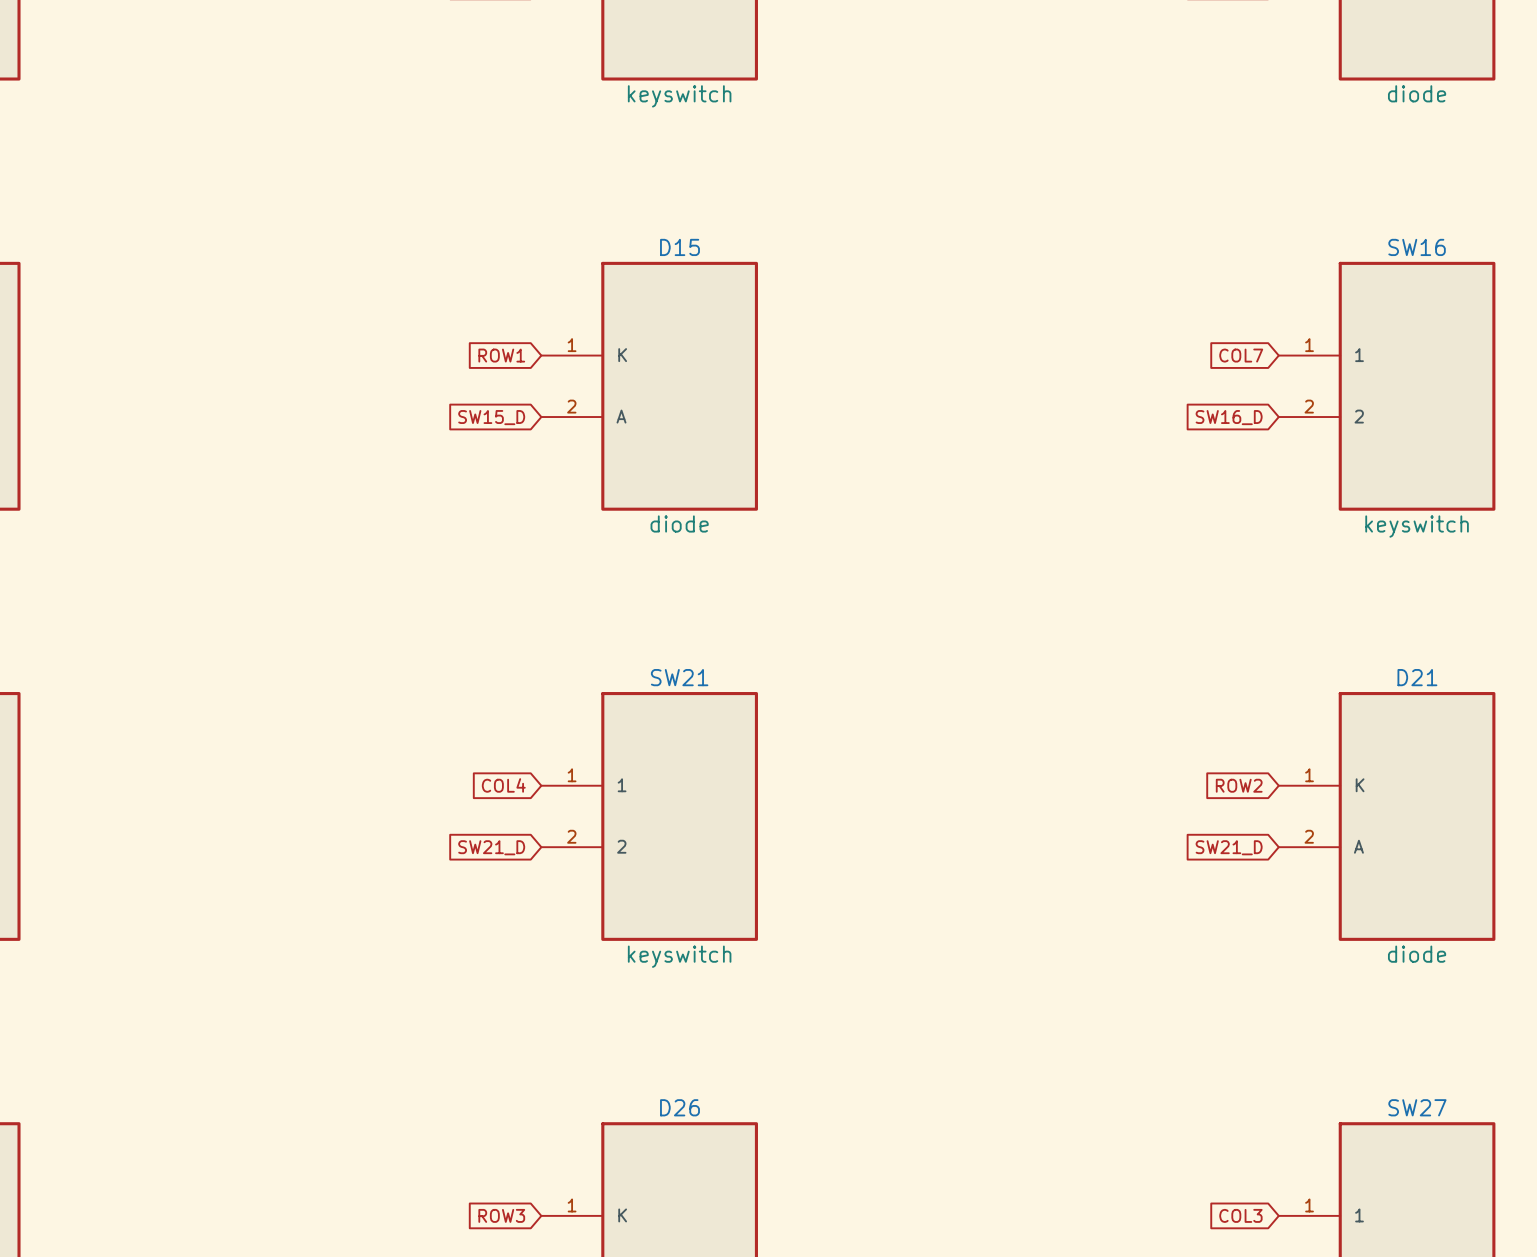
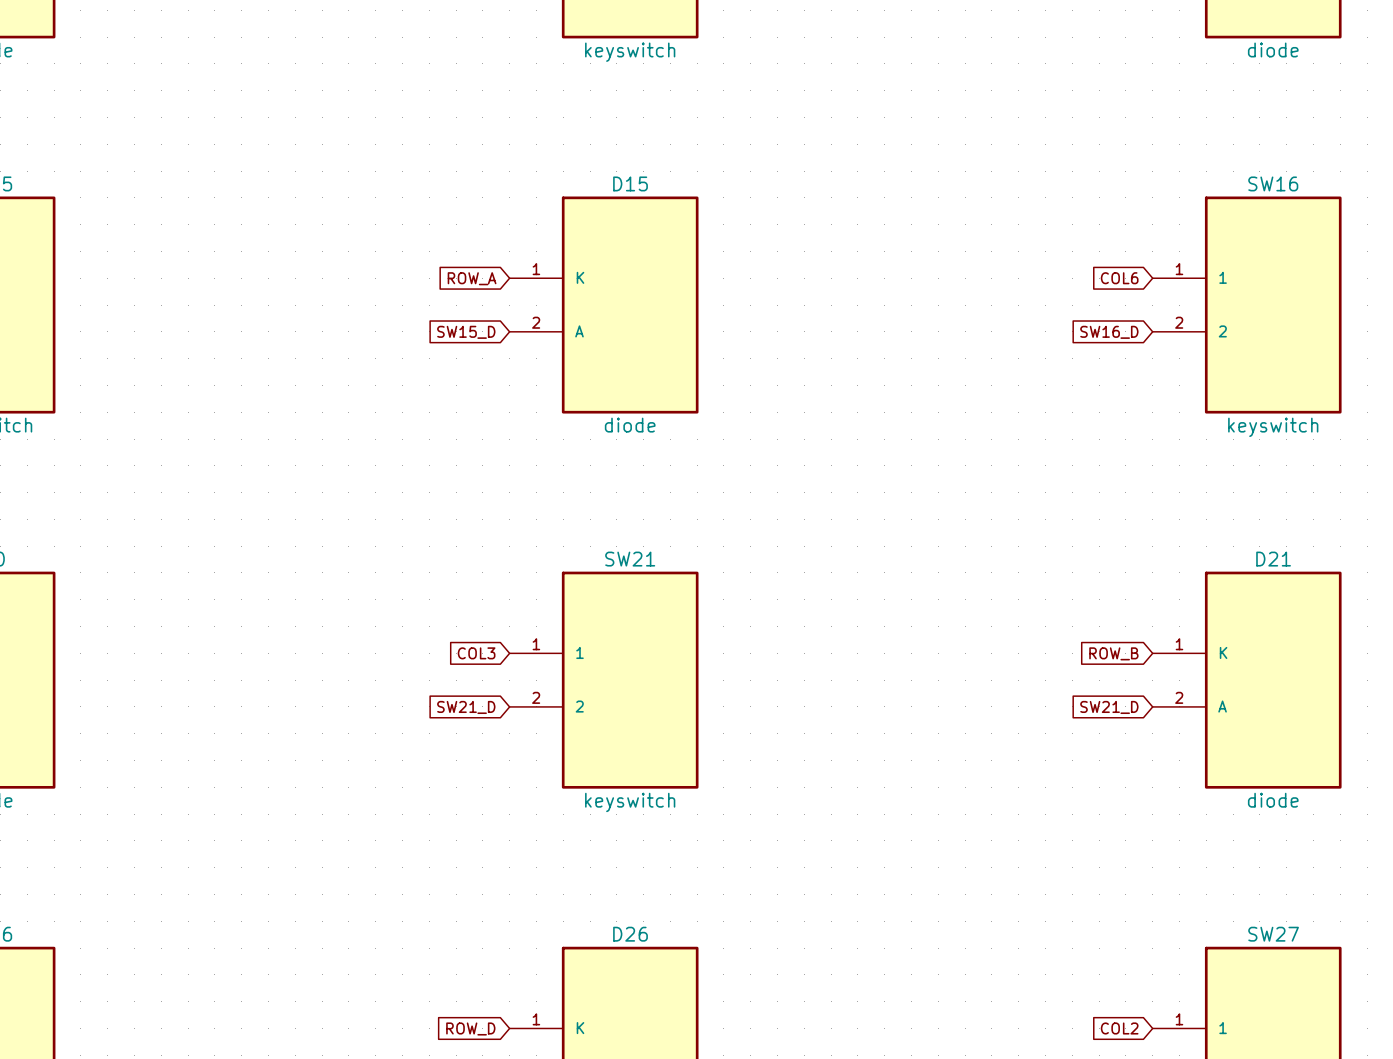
global label: ROW1 (501, 355) -> ROW_A (472, 278)
global label: COL7 (1241, 355) -> COL6 (1119, 278)
global label: COL4 (503, 785) -> COL3 (476, 653)
global label: ROW2 (1239, 785) -> ROW_B (1113, 653)
global label: ROW3 (501, 1215) -> ROW_D (470, 1028)
global label: COL3 (1240, 1215) -> COL2 (1119, 1028)

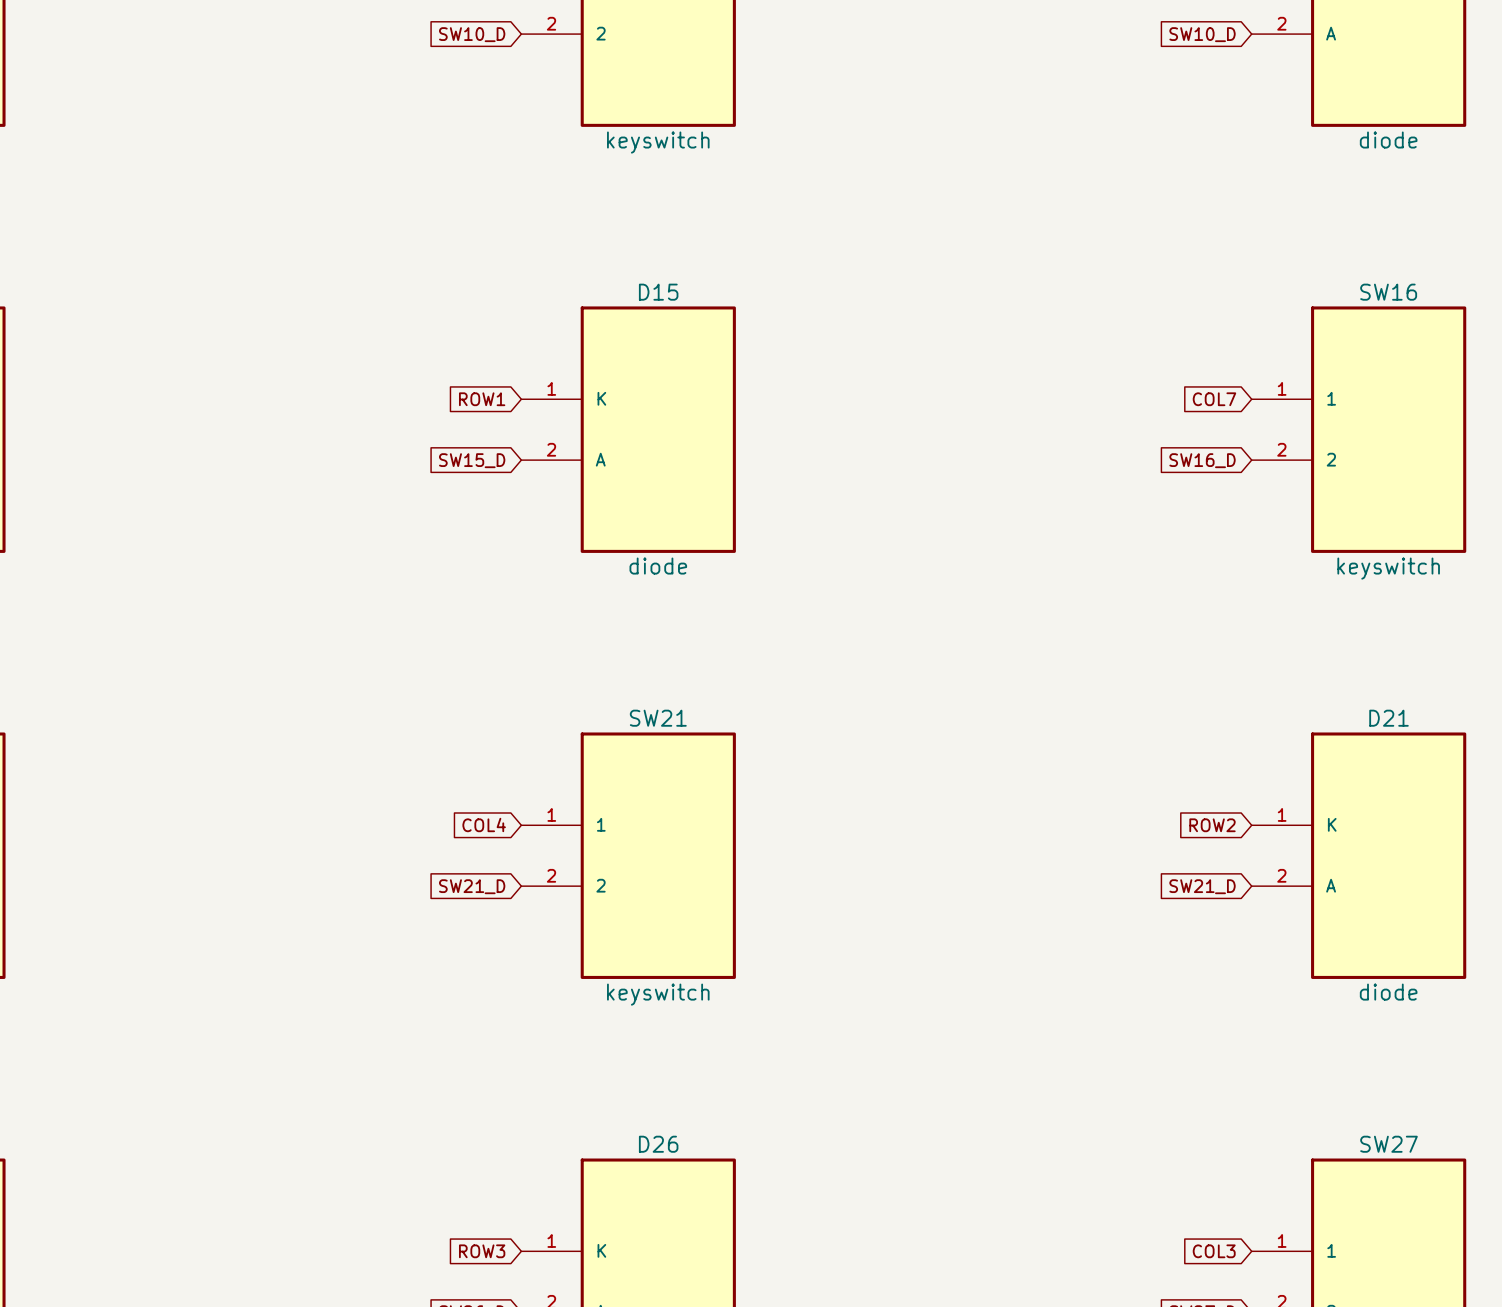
global label: ROW_A (472, 278) -> ROW1 (482, 399)
global label: COL6 (1119, 278) -> COL7 (1214, 399)
global label: COL3 (476, 653) -> COL4 (484, 825)
global label: ROW_B (1113, 653) -> ROW2 (1212, 825)
global label: ROW_D (470, 1028) -> ROW3 (482, 1251)
global label: COL2 (1119, 1028) -> COL3 (1214, 1251)

